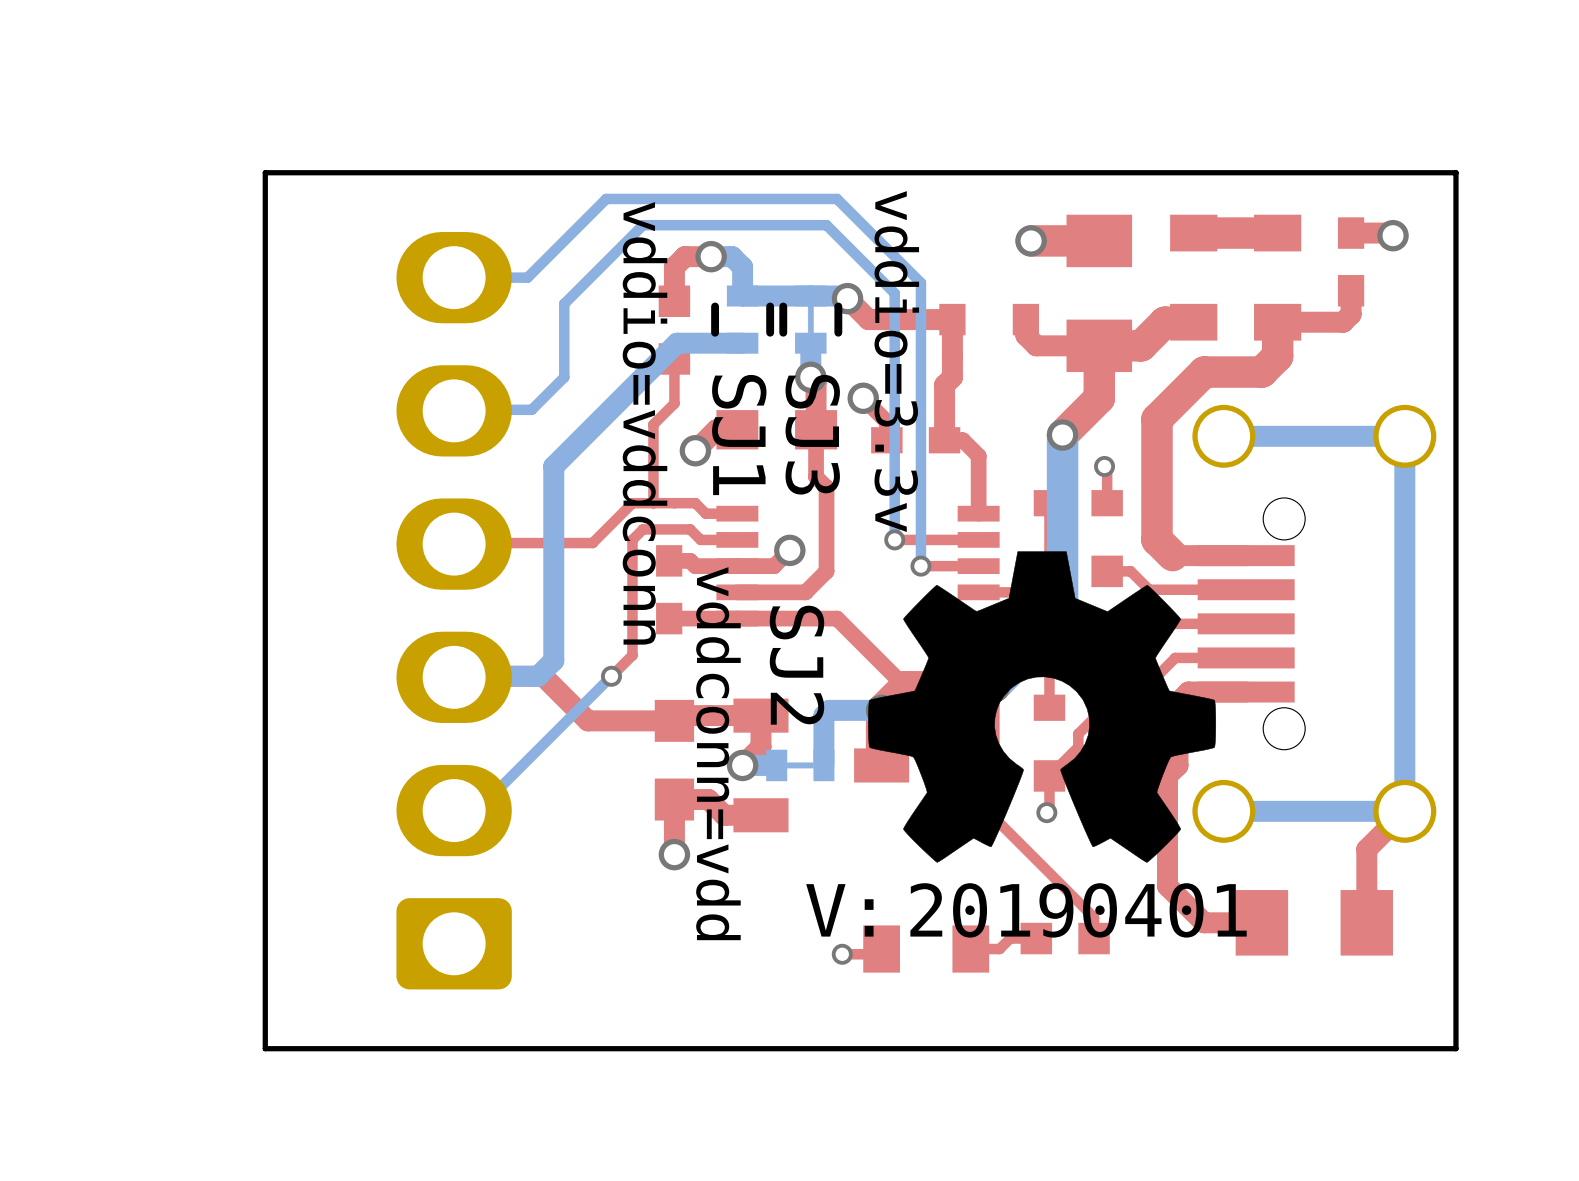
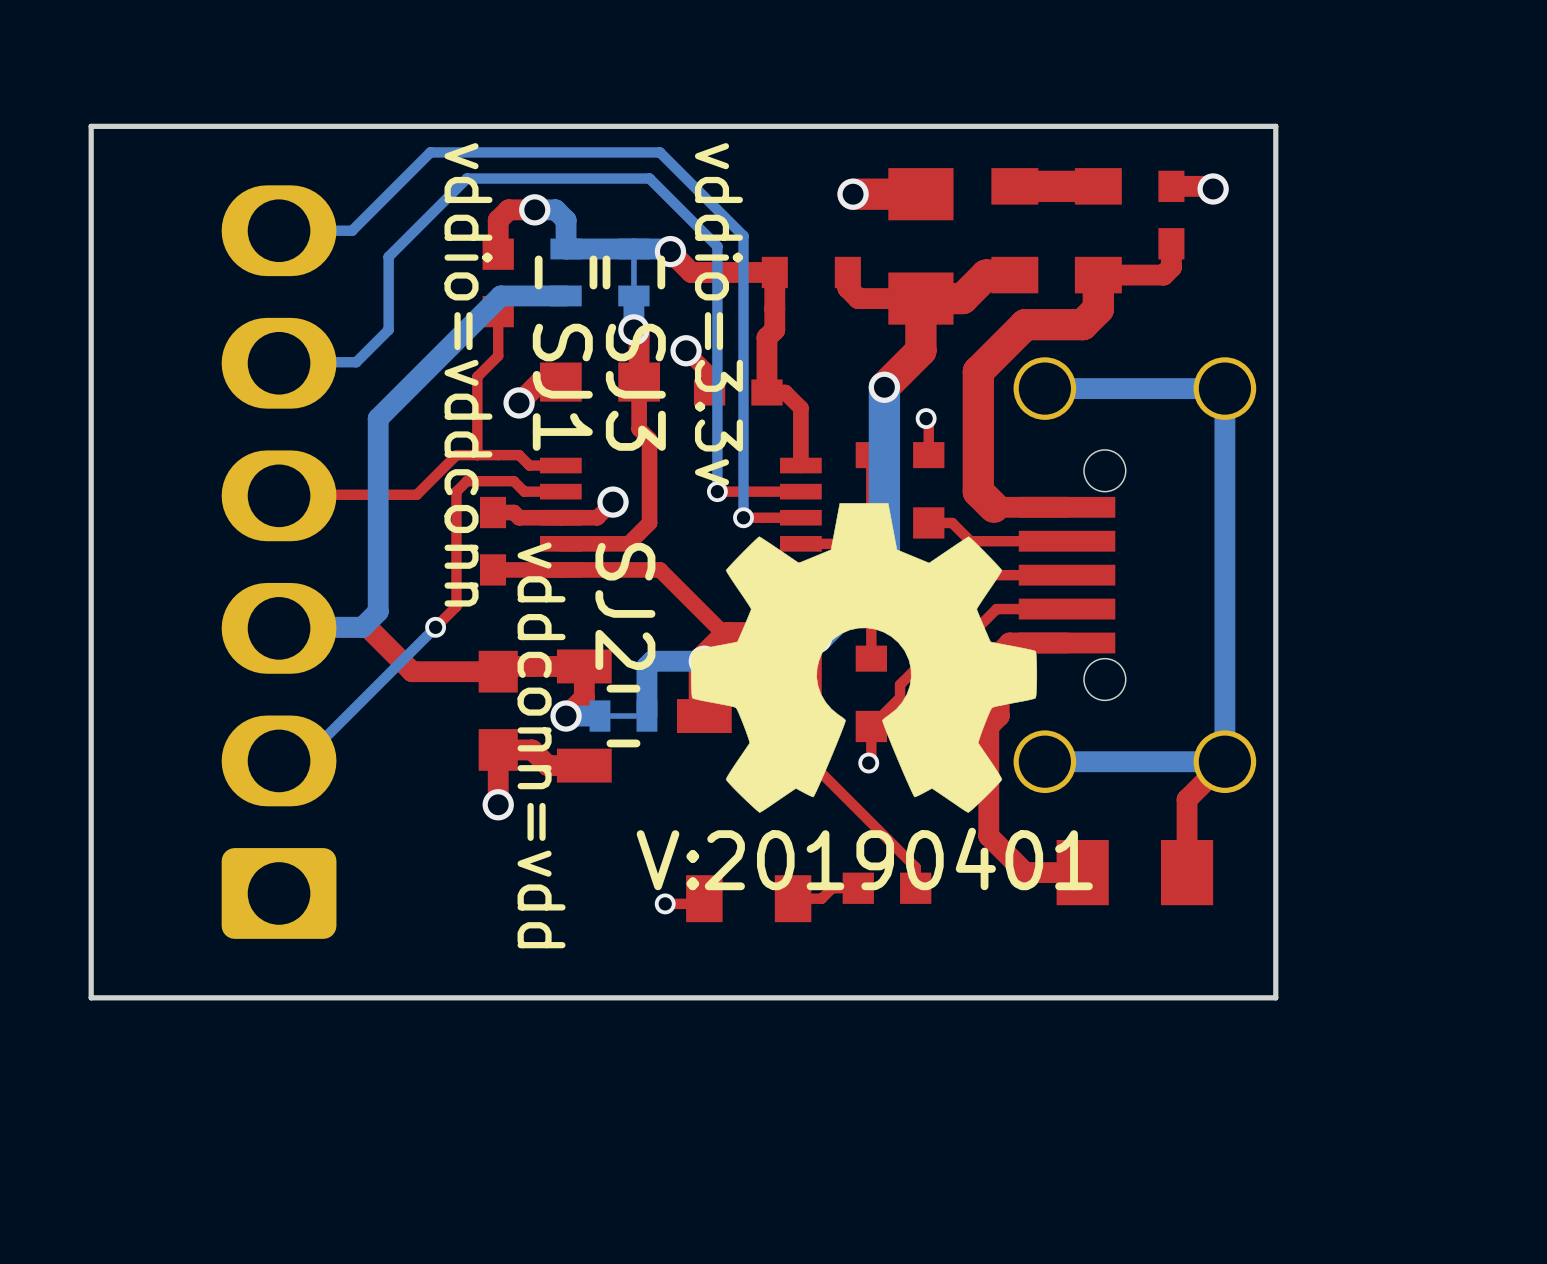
SJ2 footprint: [766, 749, 835, 782] -> [589, 684, 658, 748]

